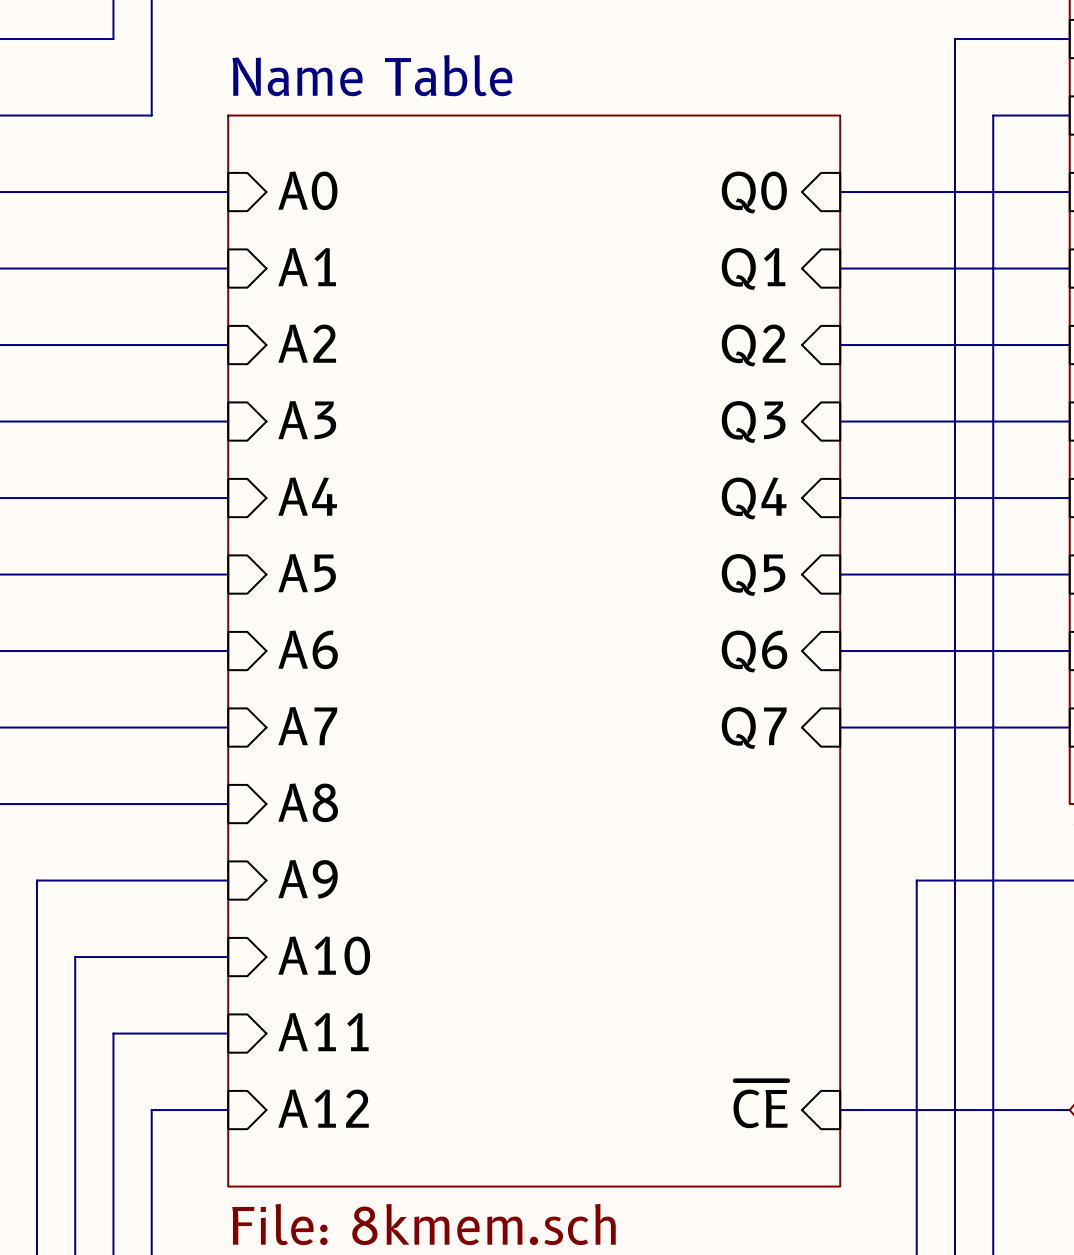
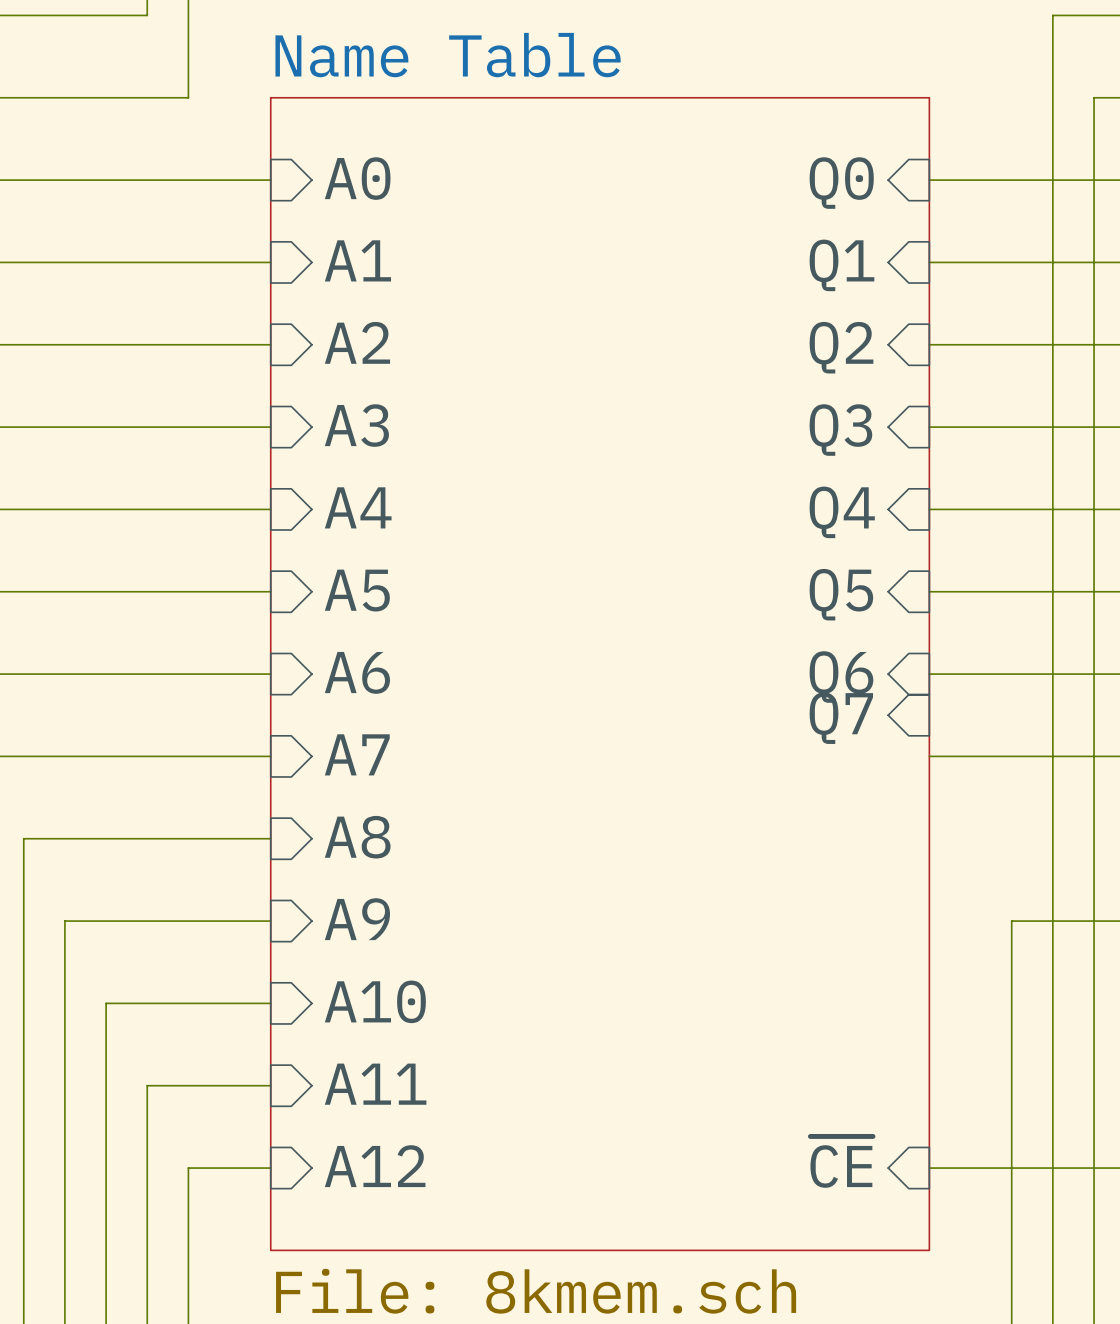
sheet pin position: Q7 (754, 727) -> Q7 (841, 718)

